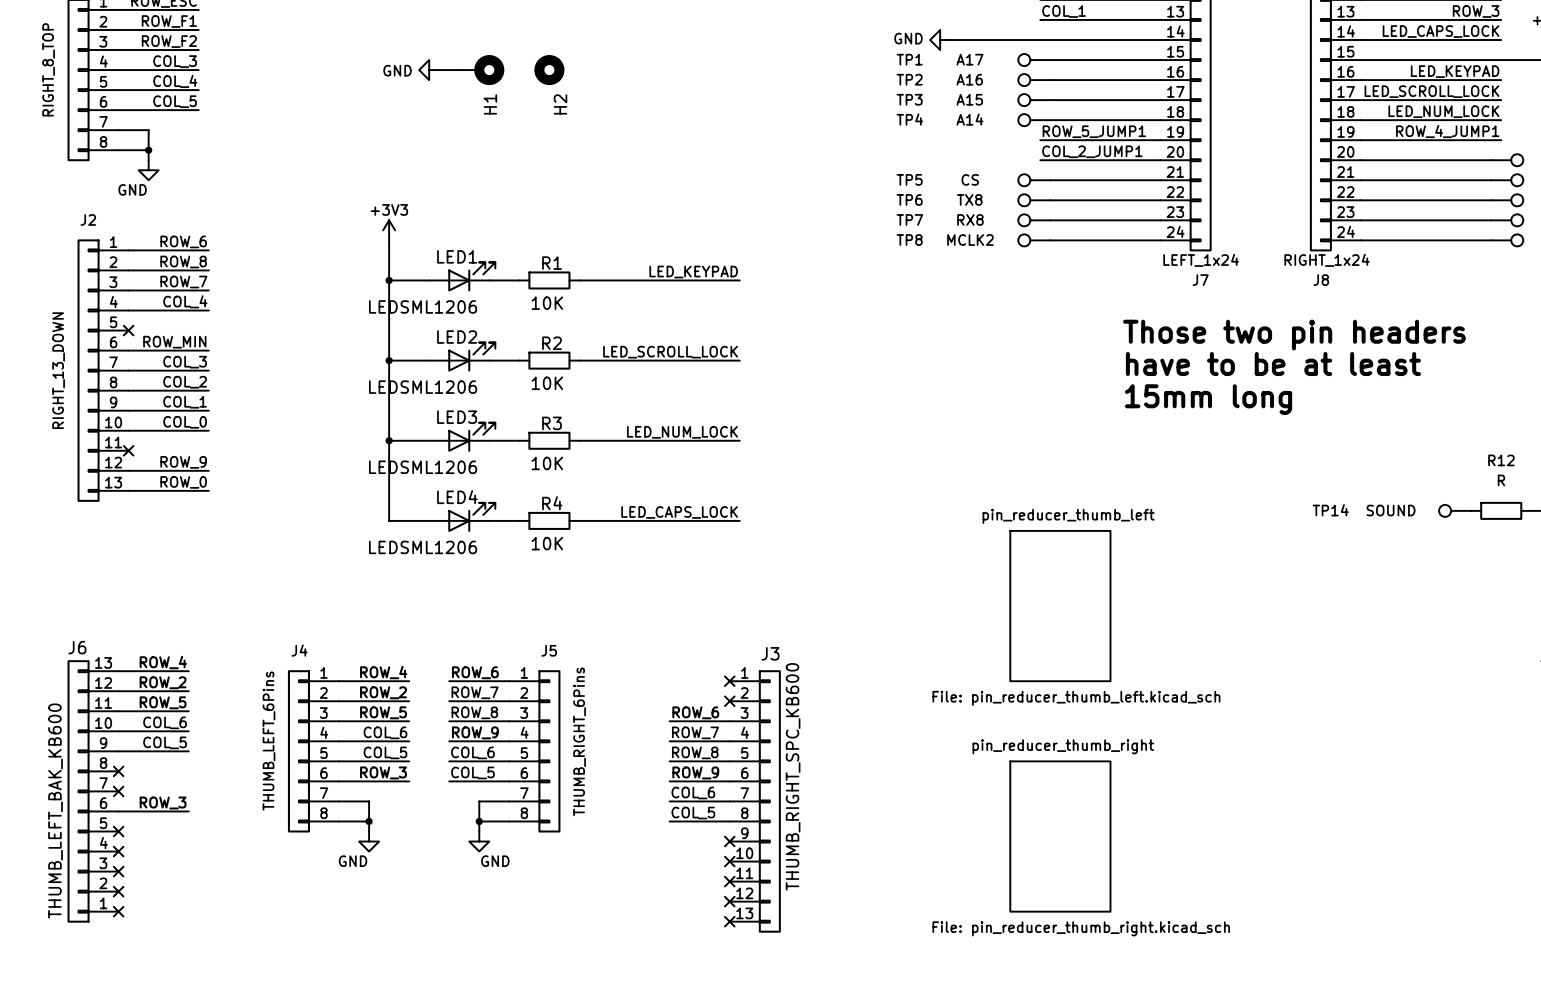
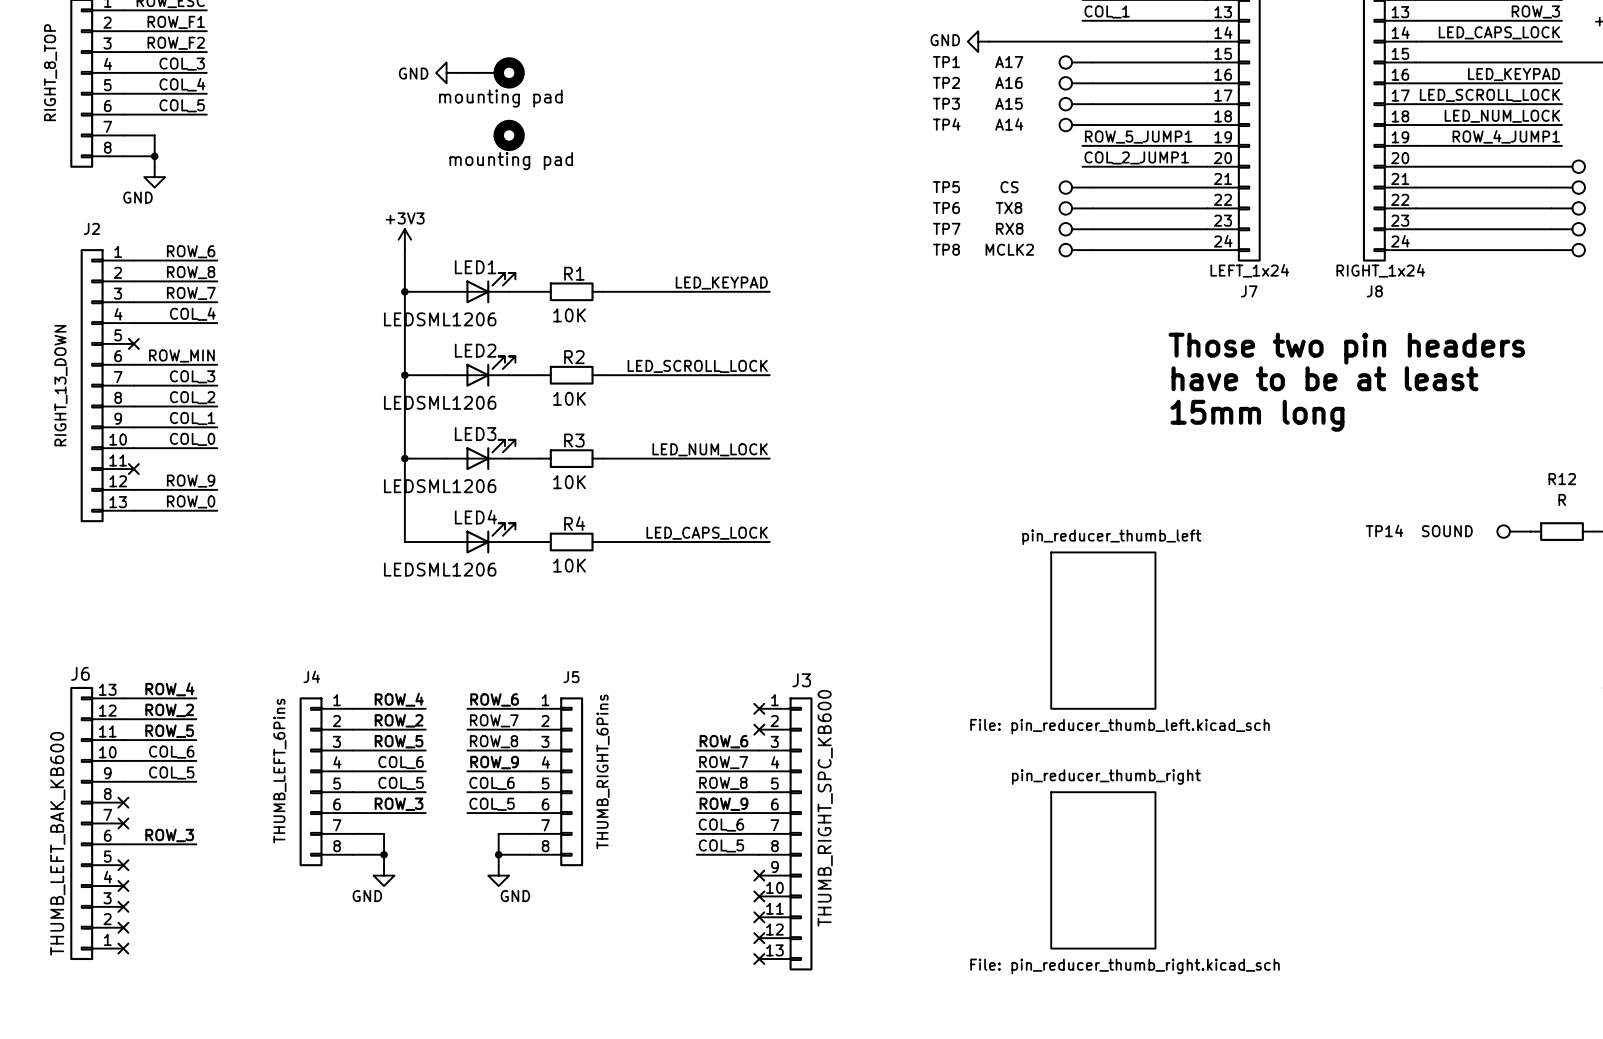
H2: (549, 70) -> none
H1 value: none -> mounting pad (500, 98)
H1 name: H1 (490, 104) -> none
part: none -> mounting pad (509, 135)

